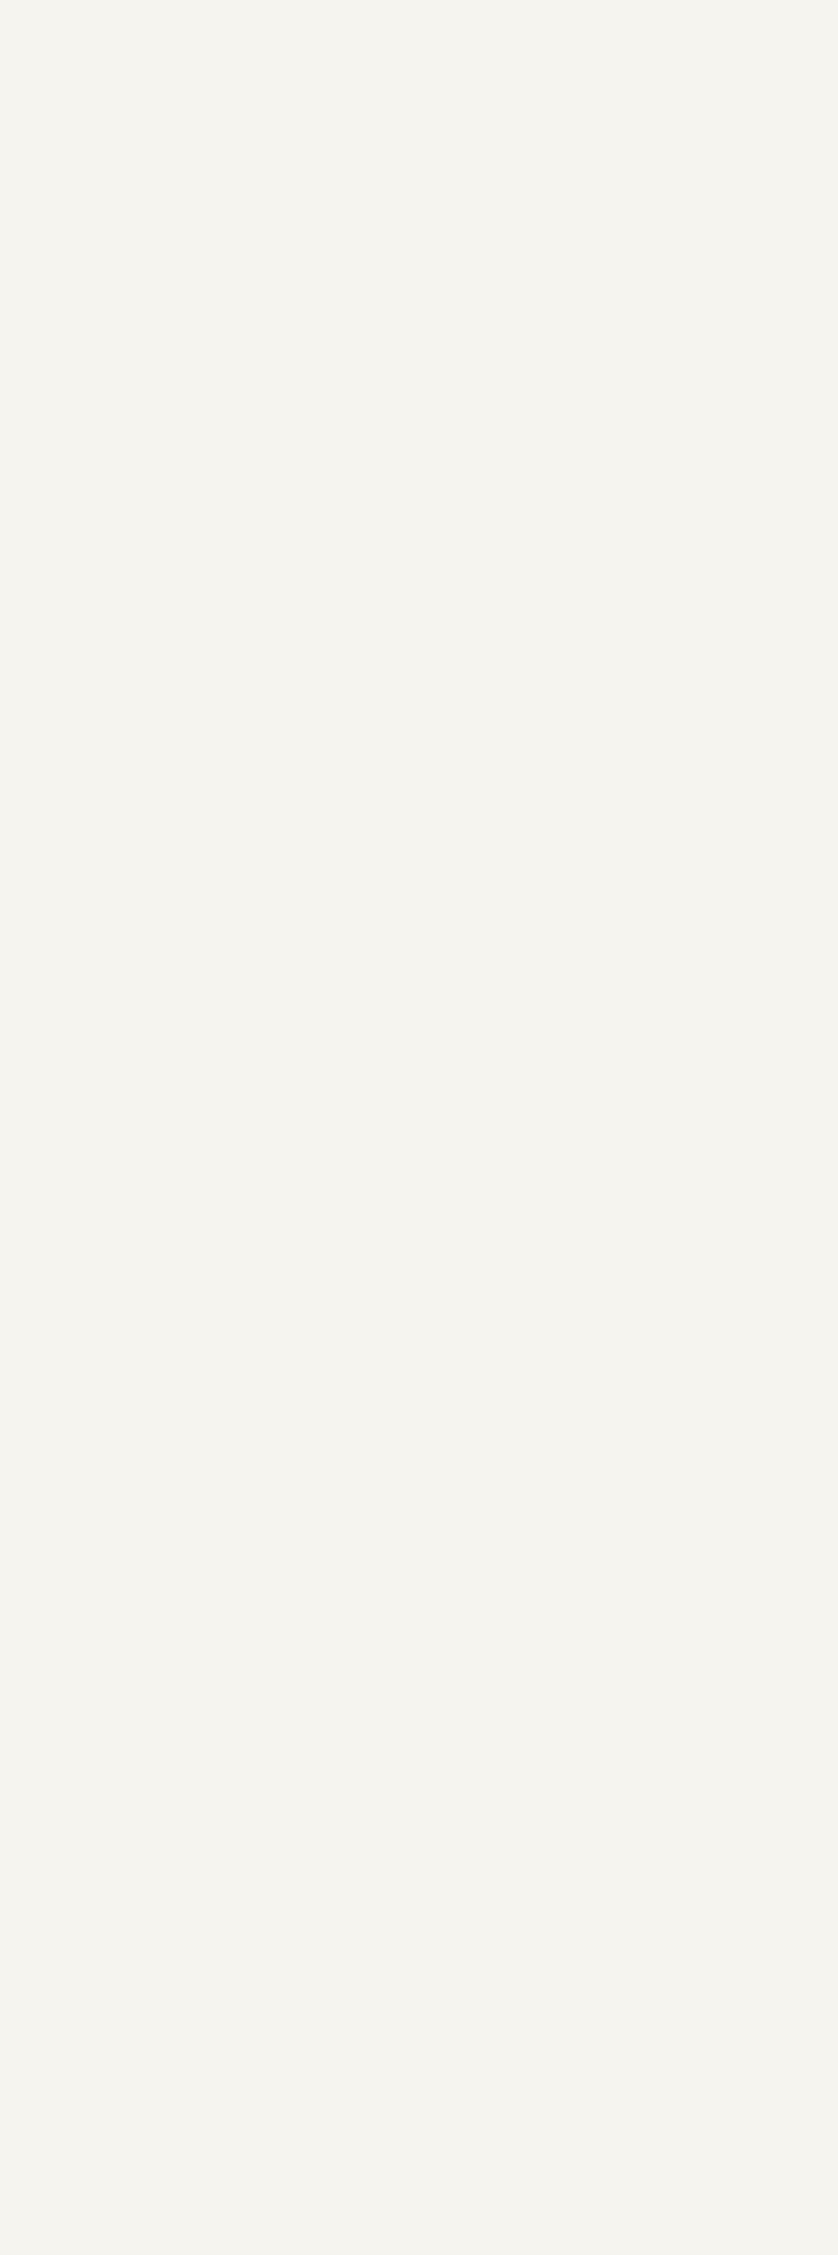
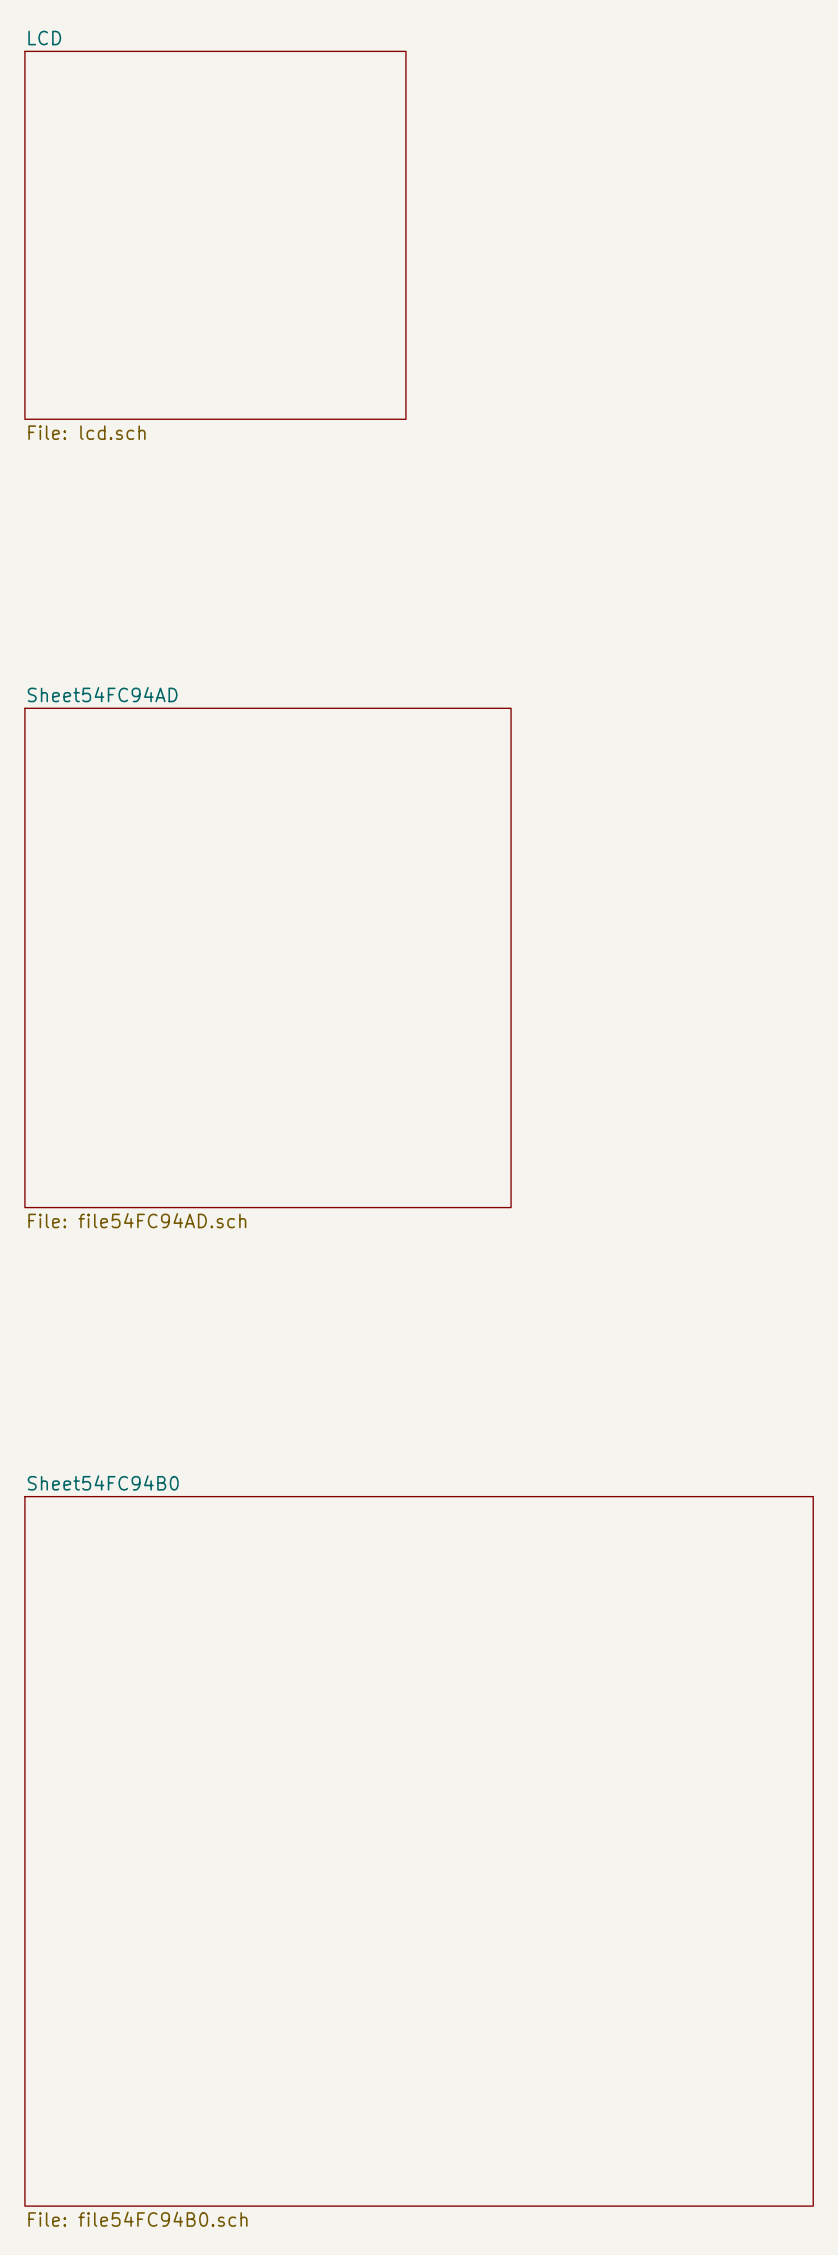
sheet LCD: none -> File: lcd.sch (215, 235)
sheet Sheet54FC94AD: none -> File: file54FC94AD.sch (267, 957)
sheet Sheet54FC94B0: none -> File: file54FC94B0.sch (419, 1851)

